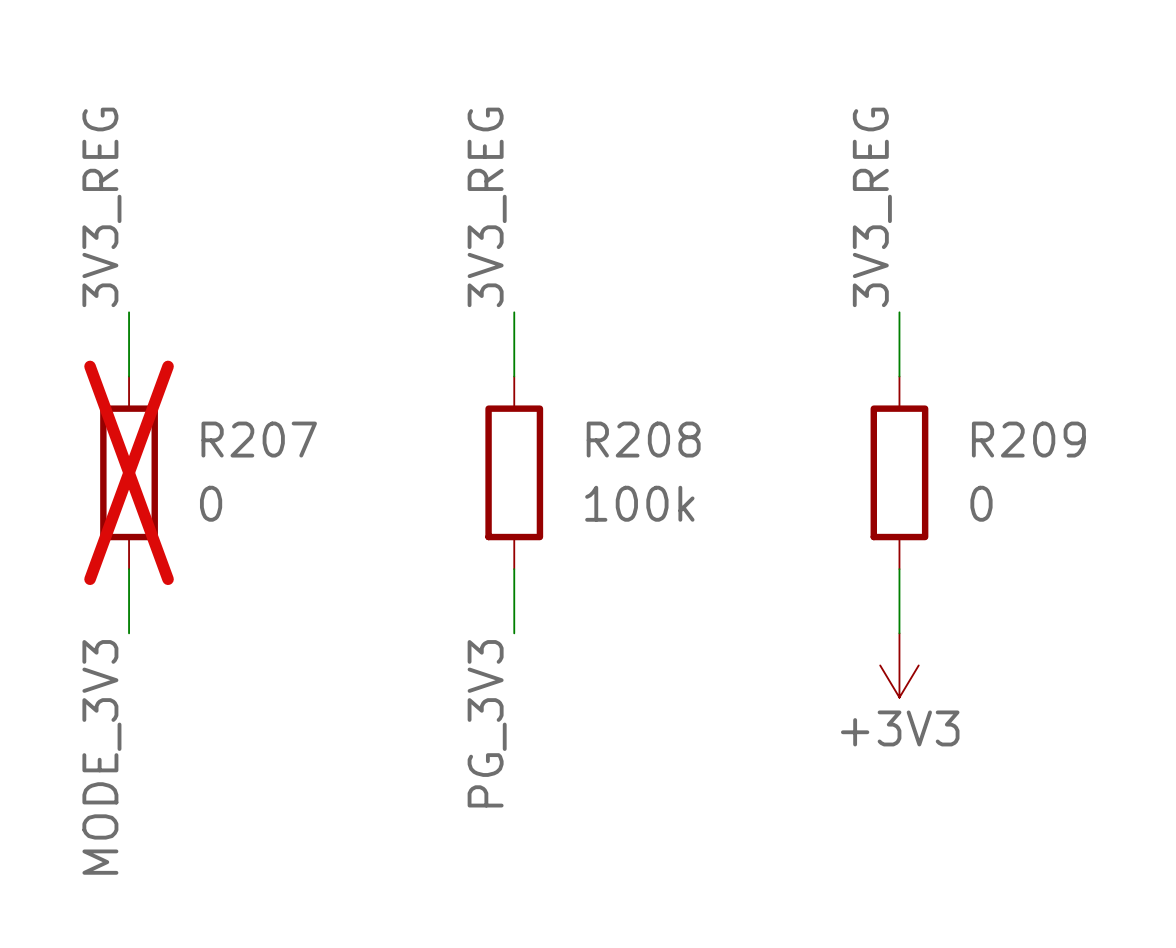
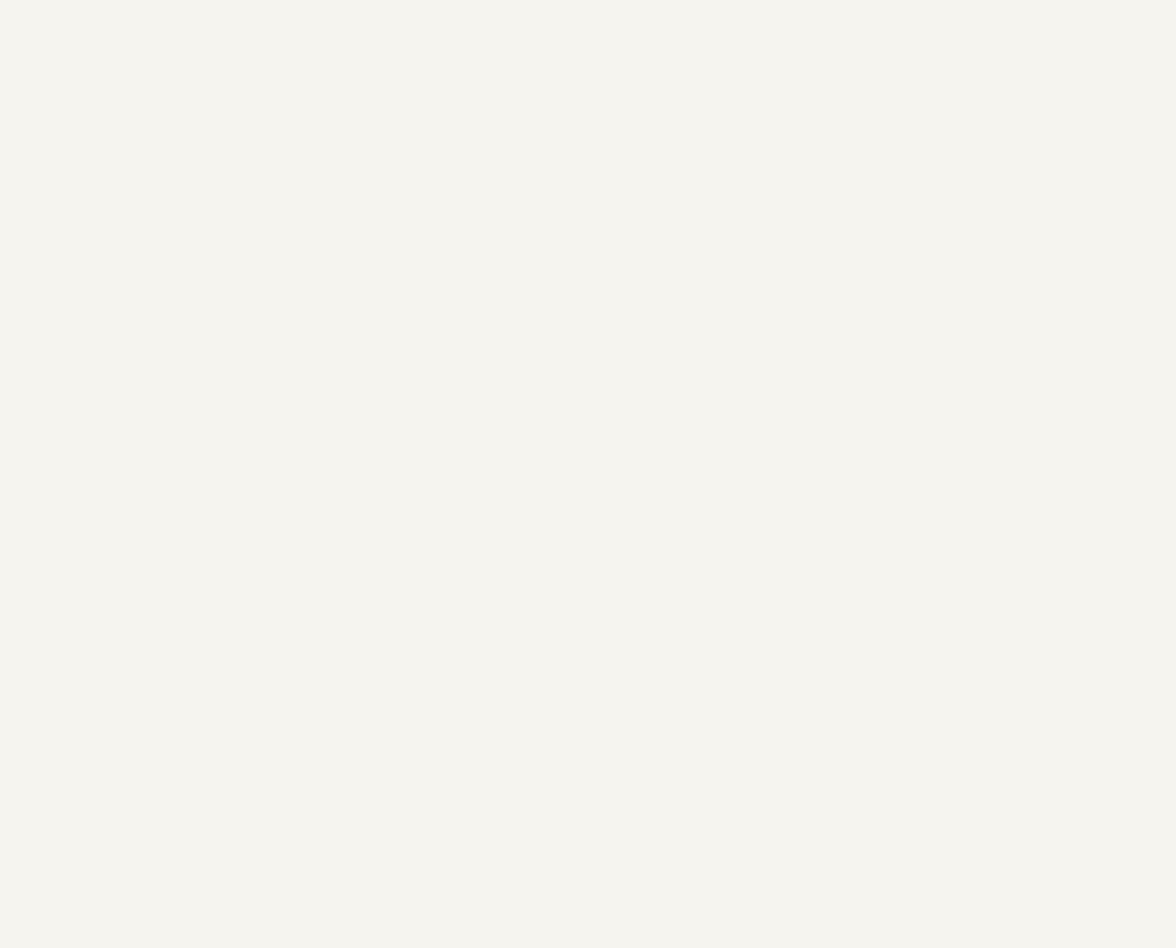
label: 3V3_REG (101, 207) -> none
label: 3V3_REG (487, 207) -> none
label: 3V3_REG (872, 207) -> none
wire: (129, 312) (129, 376) -> none
wire: (514, 312) (514, 376) -> none
wire: (899, 312) (899, 376) -> none
R207: 0 (129, 472) -> none
R208: 100k (514, 472) -> none
R209: 0 (899, 472) -> none
wire: (129, 569) (129, 633) -> none
wire: (514, 569) (514, 633) -> none
wire: (899, 569) (899, 633) -> none
power symbol: +3V3 (899, 665) -> none
label: PG_3V3 (487, 723) -> none
label: MODE_3V3 (101, 757) -> none

